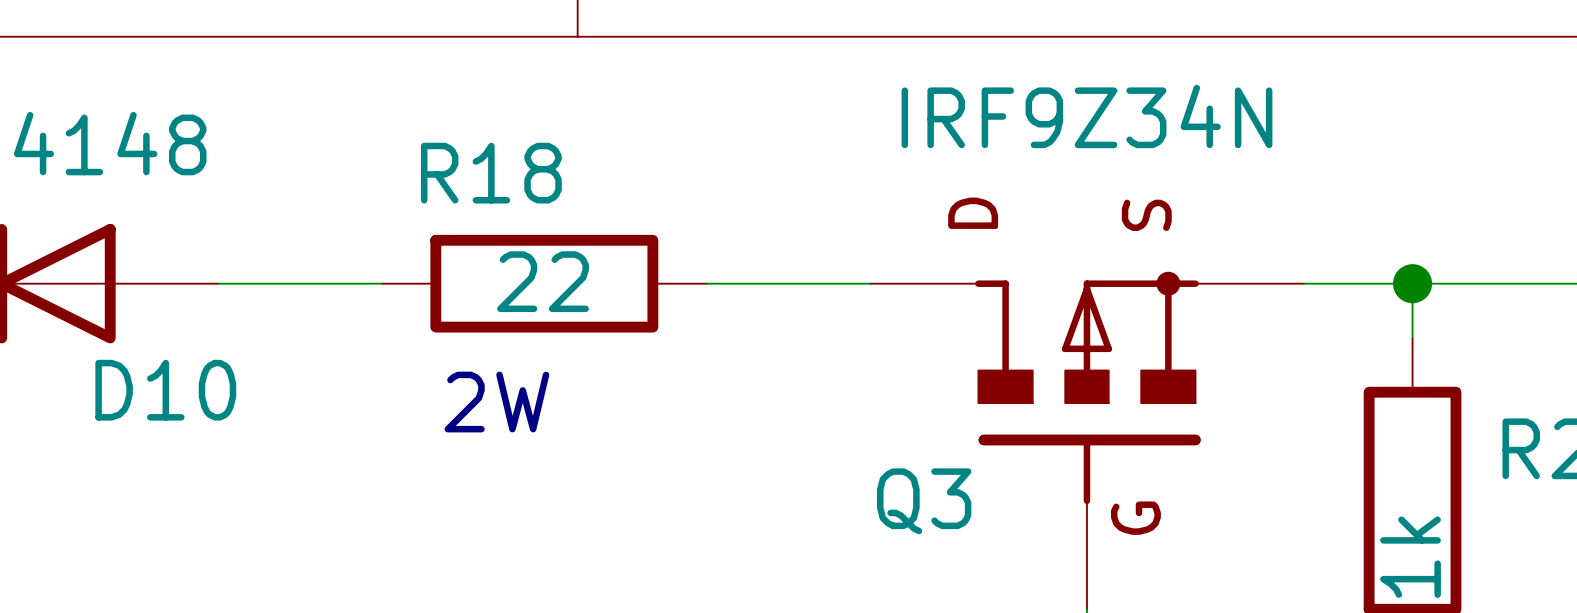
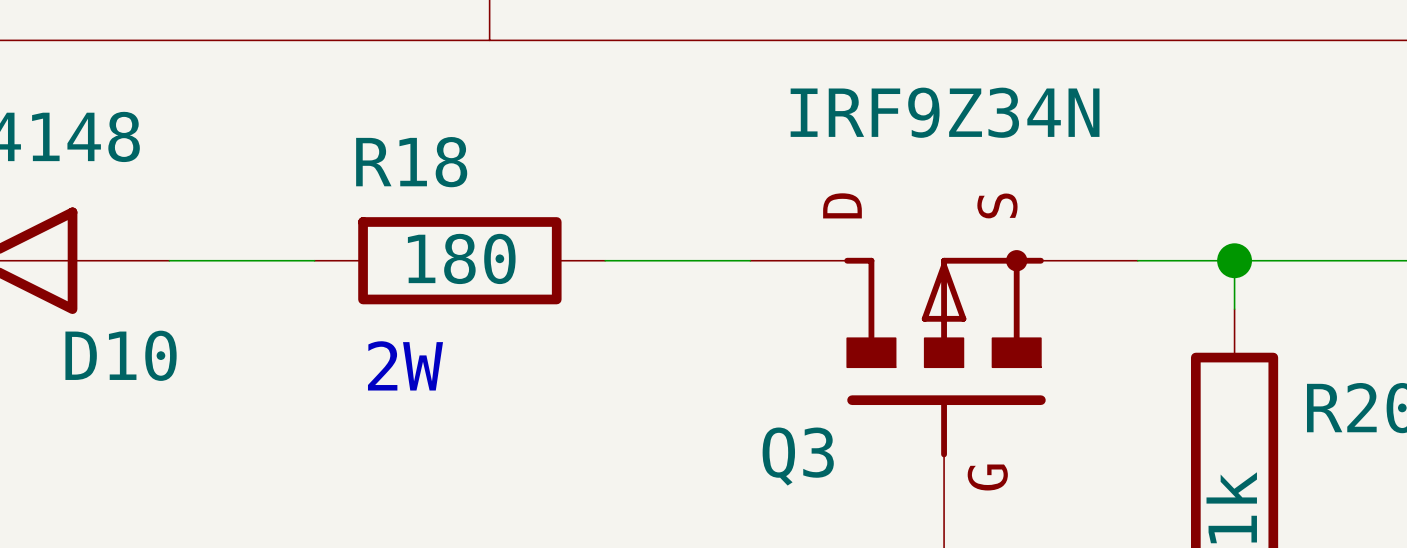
R18 value: 22 (543, 281) -> 180 (461, 258)

